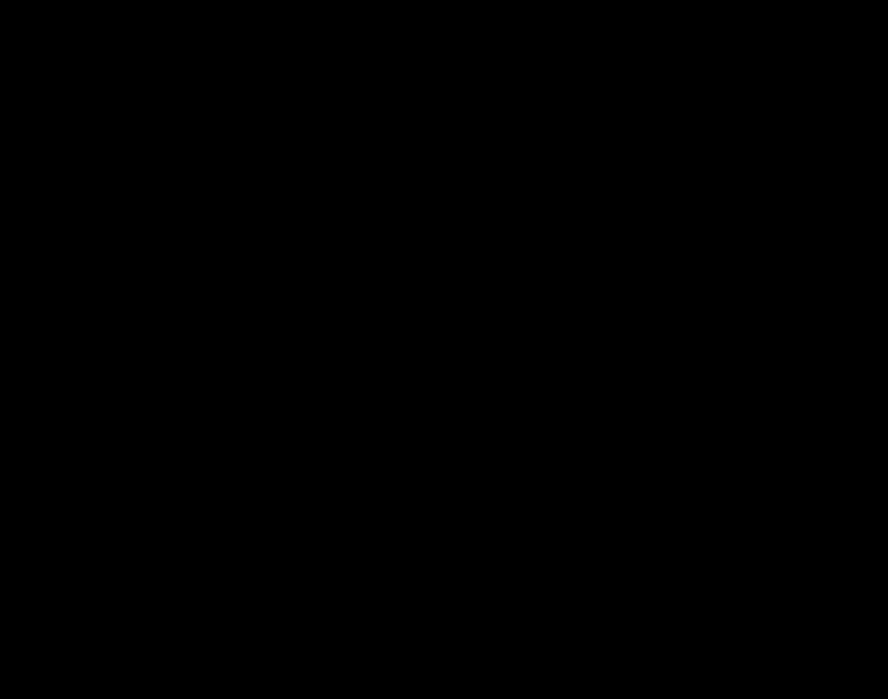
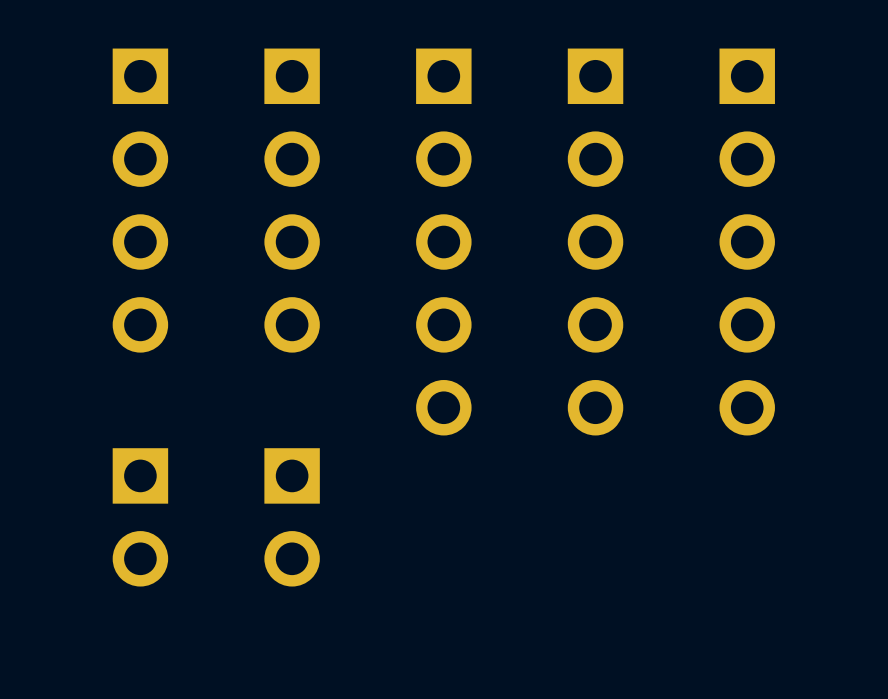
part: none -> (140, 200)
part: none -> (292, 200)
part: none -> (443, 242)
part: none -> (595, 242)
part: none -> (747, 242)
part: none -> (140, 517)
part: none -> (292, 517)

